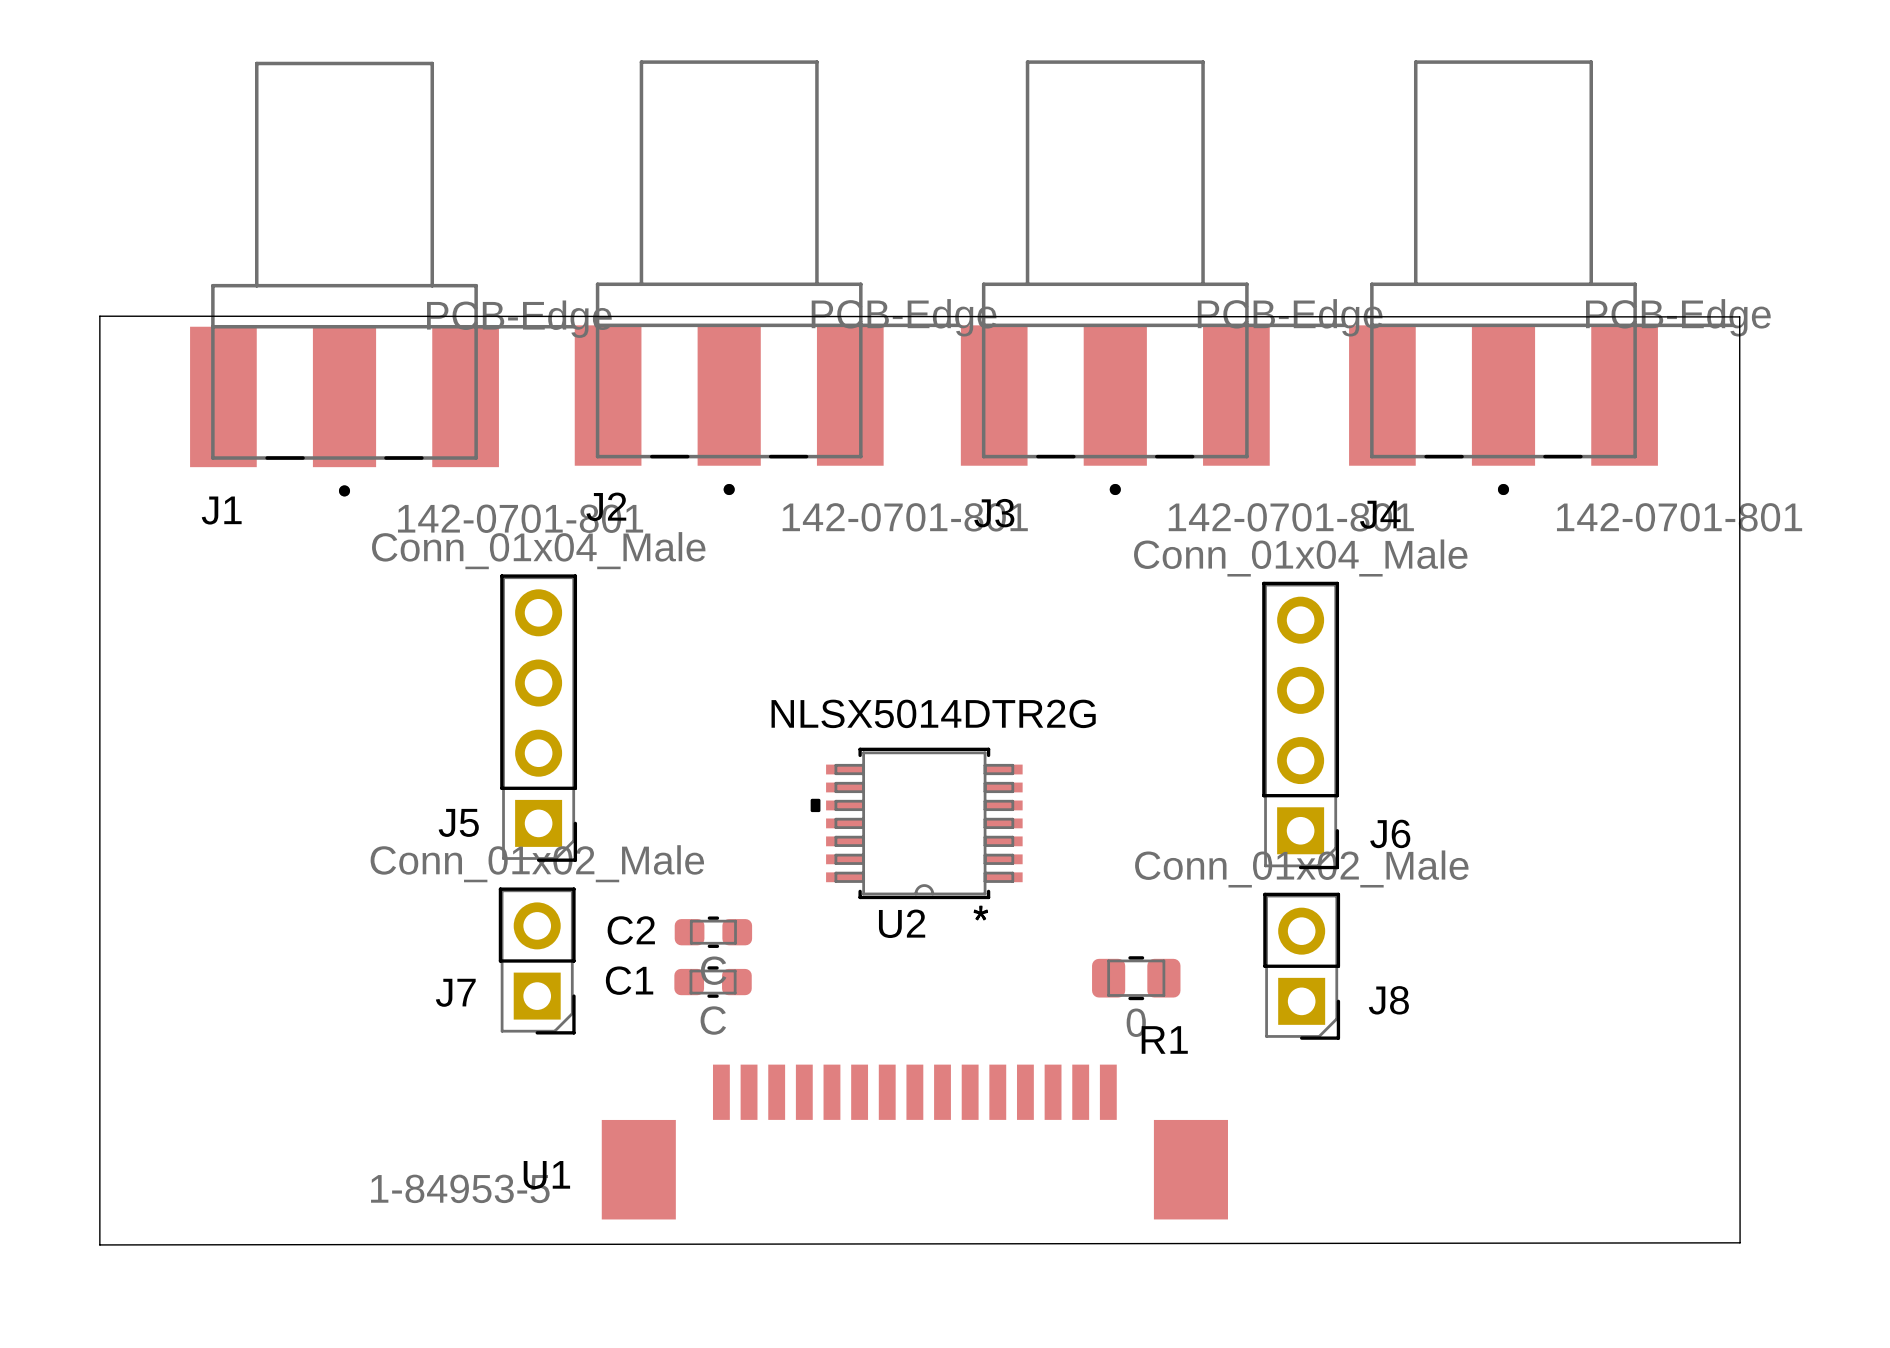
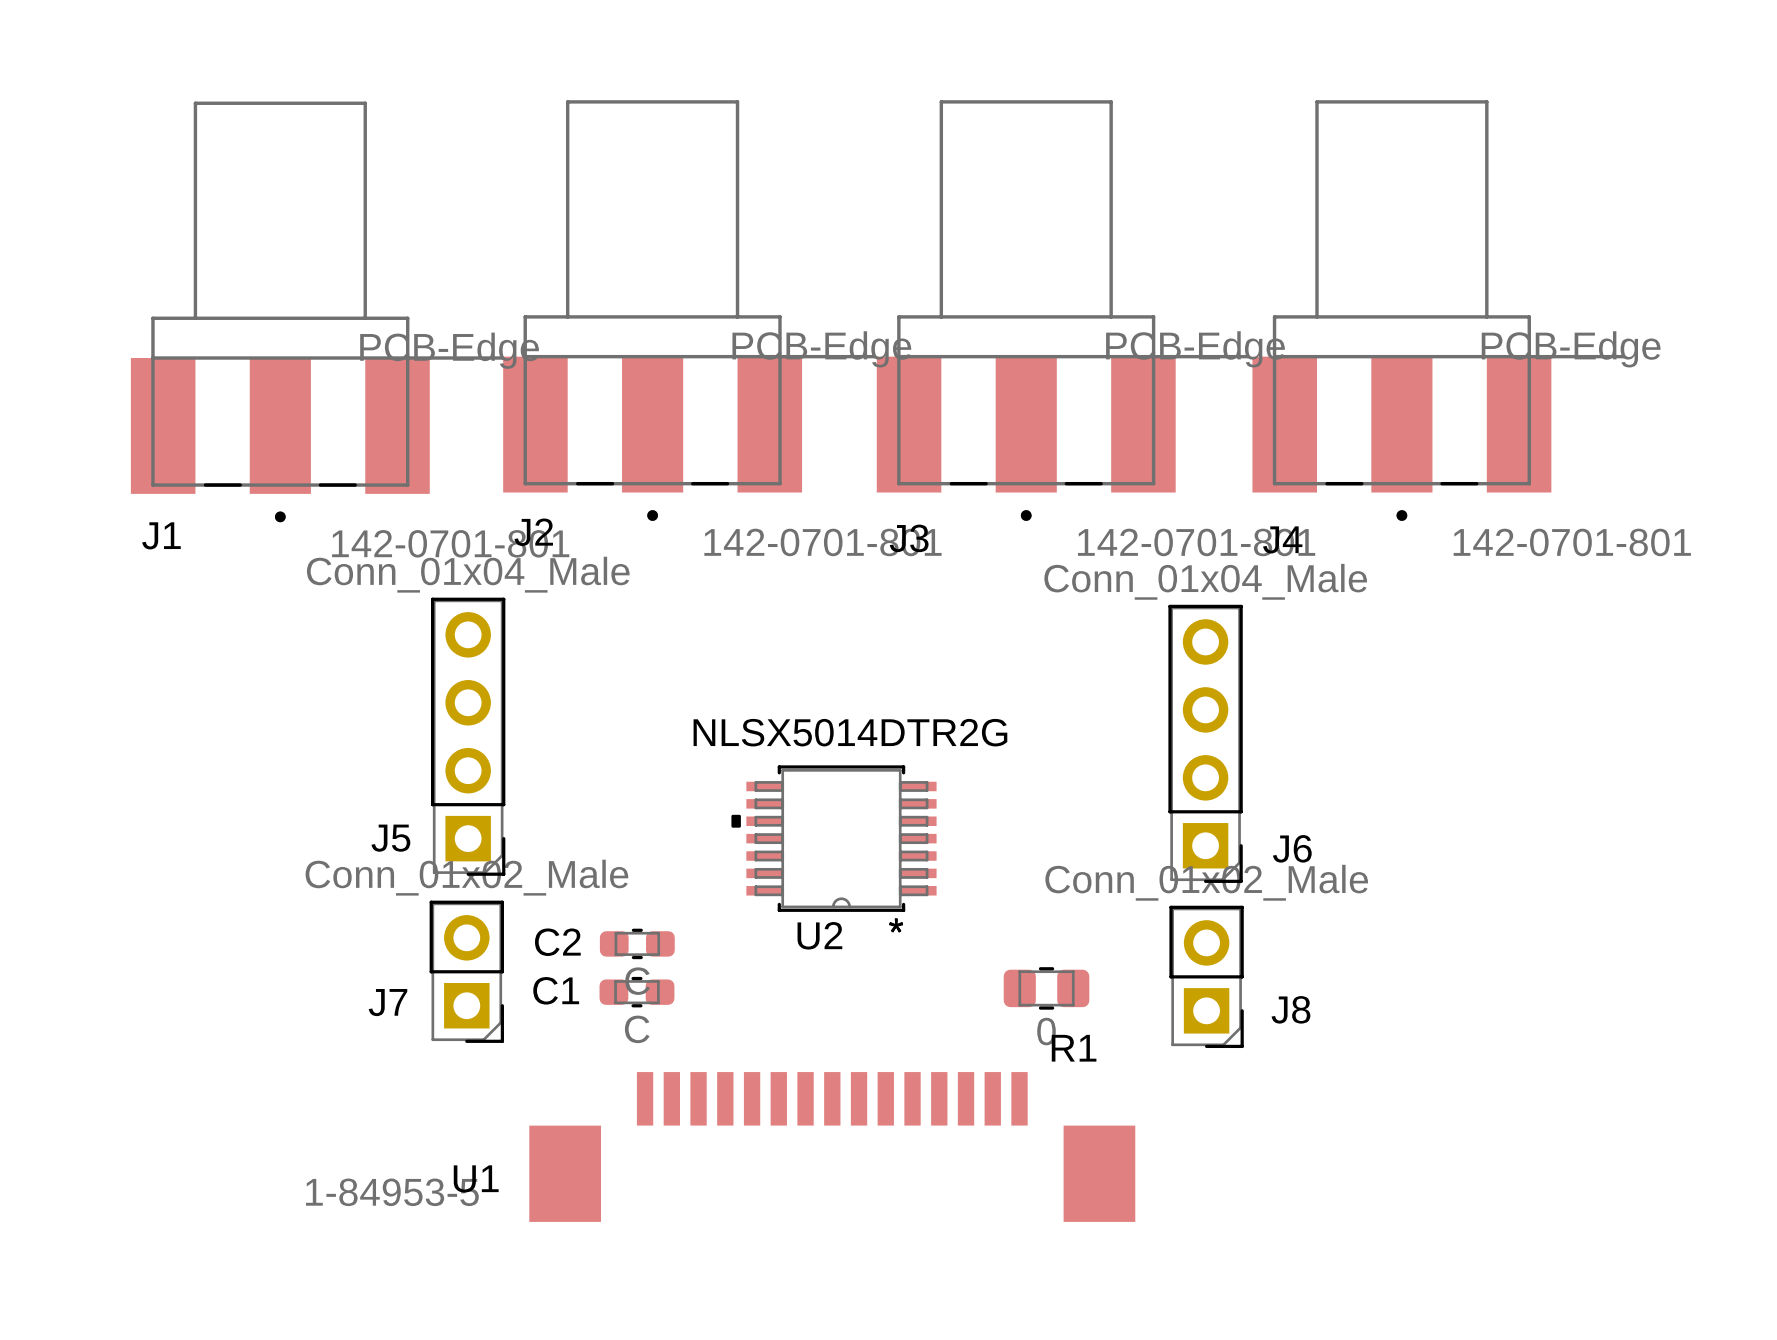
board edge: (99, 316) (99, 1244) (1740, 1242) (1739, 316) (99, 316) -> none

